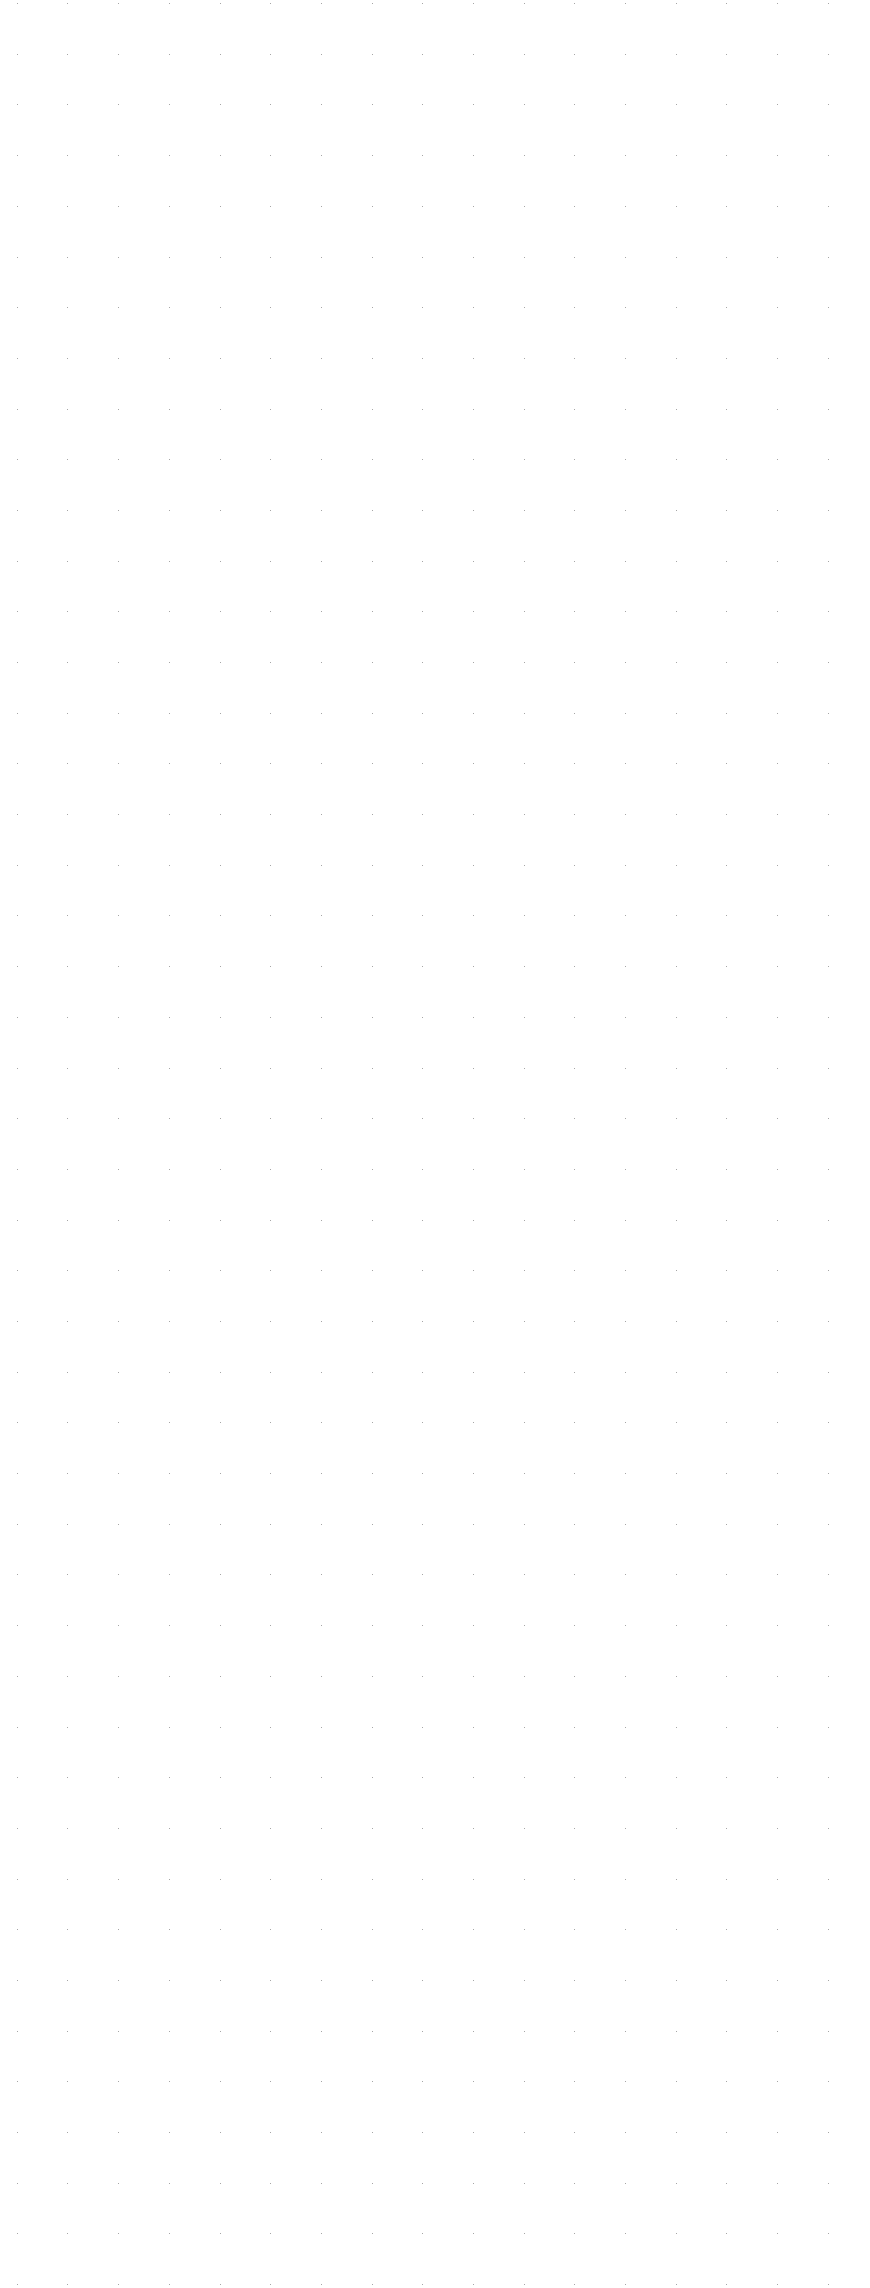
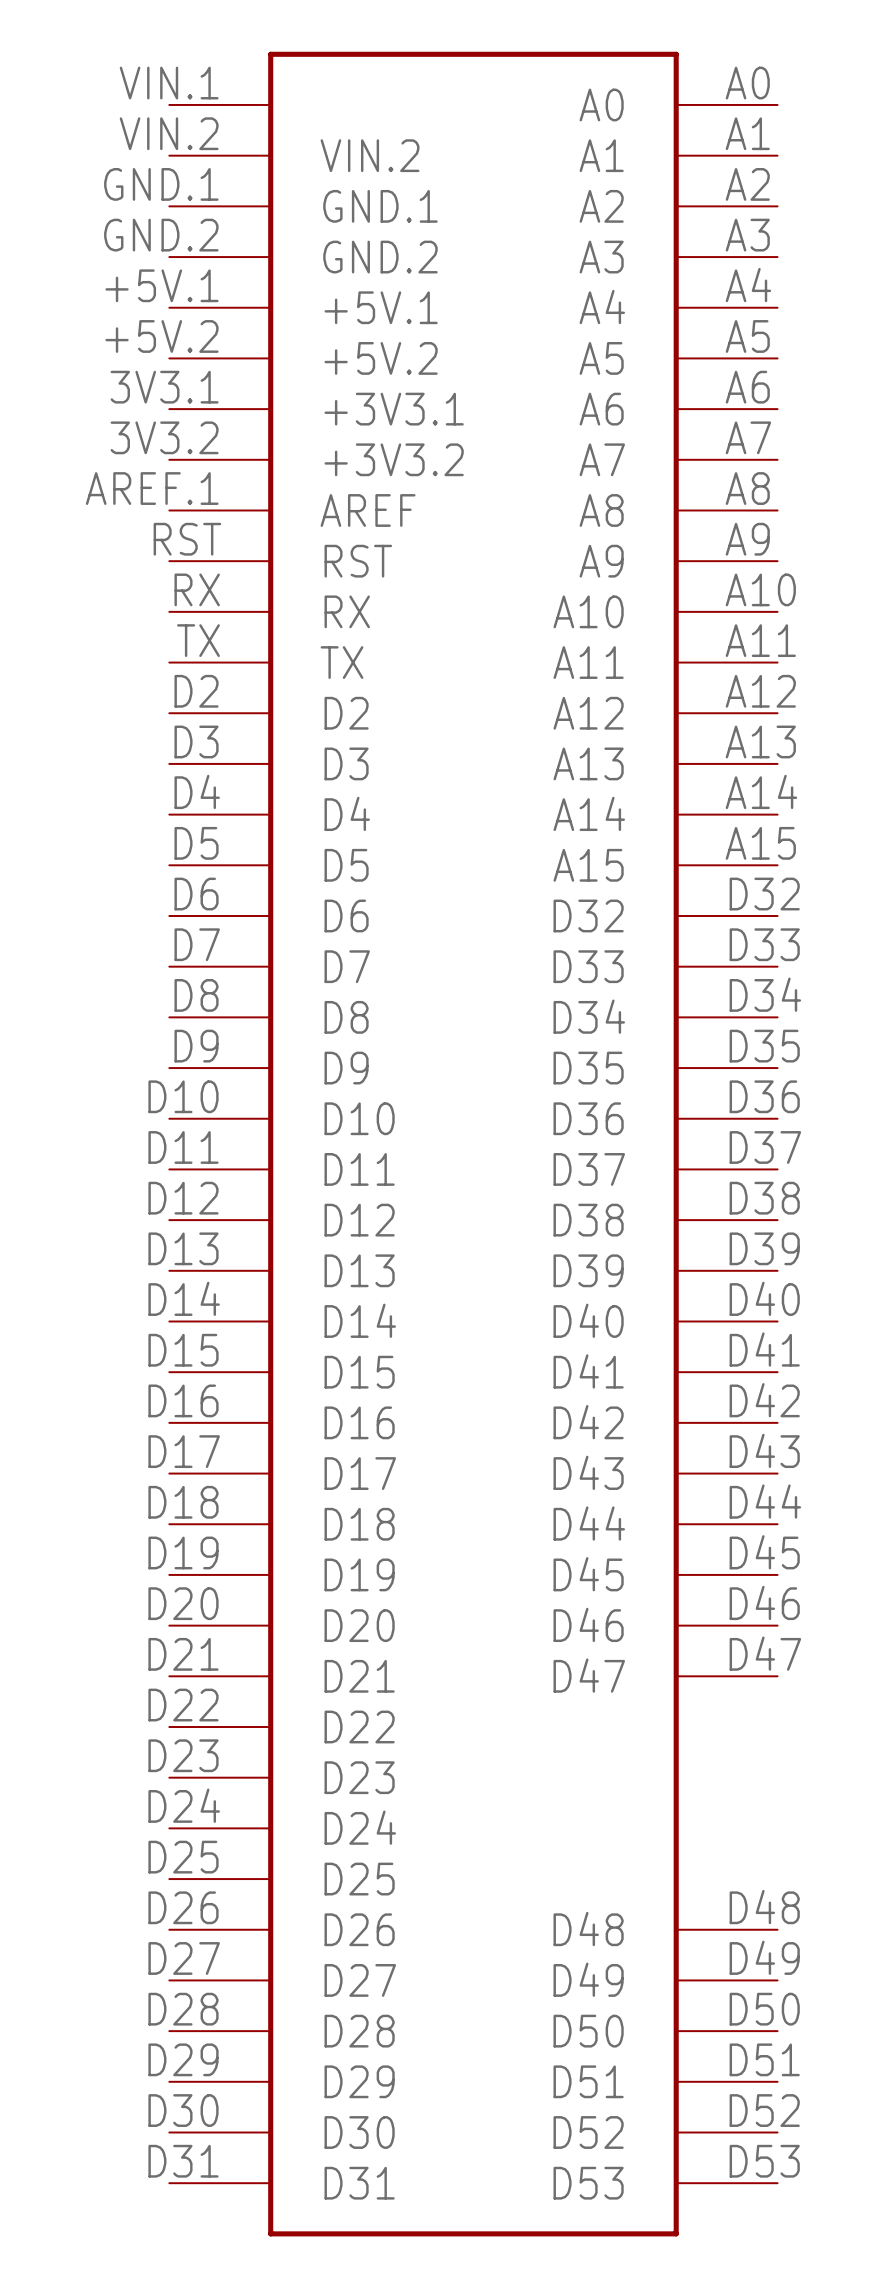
part: none -> (473, 1144)

